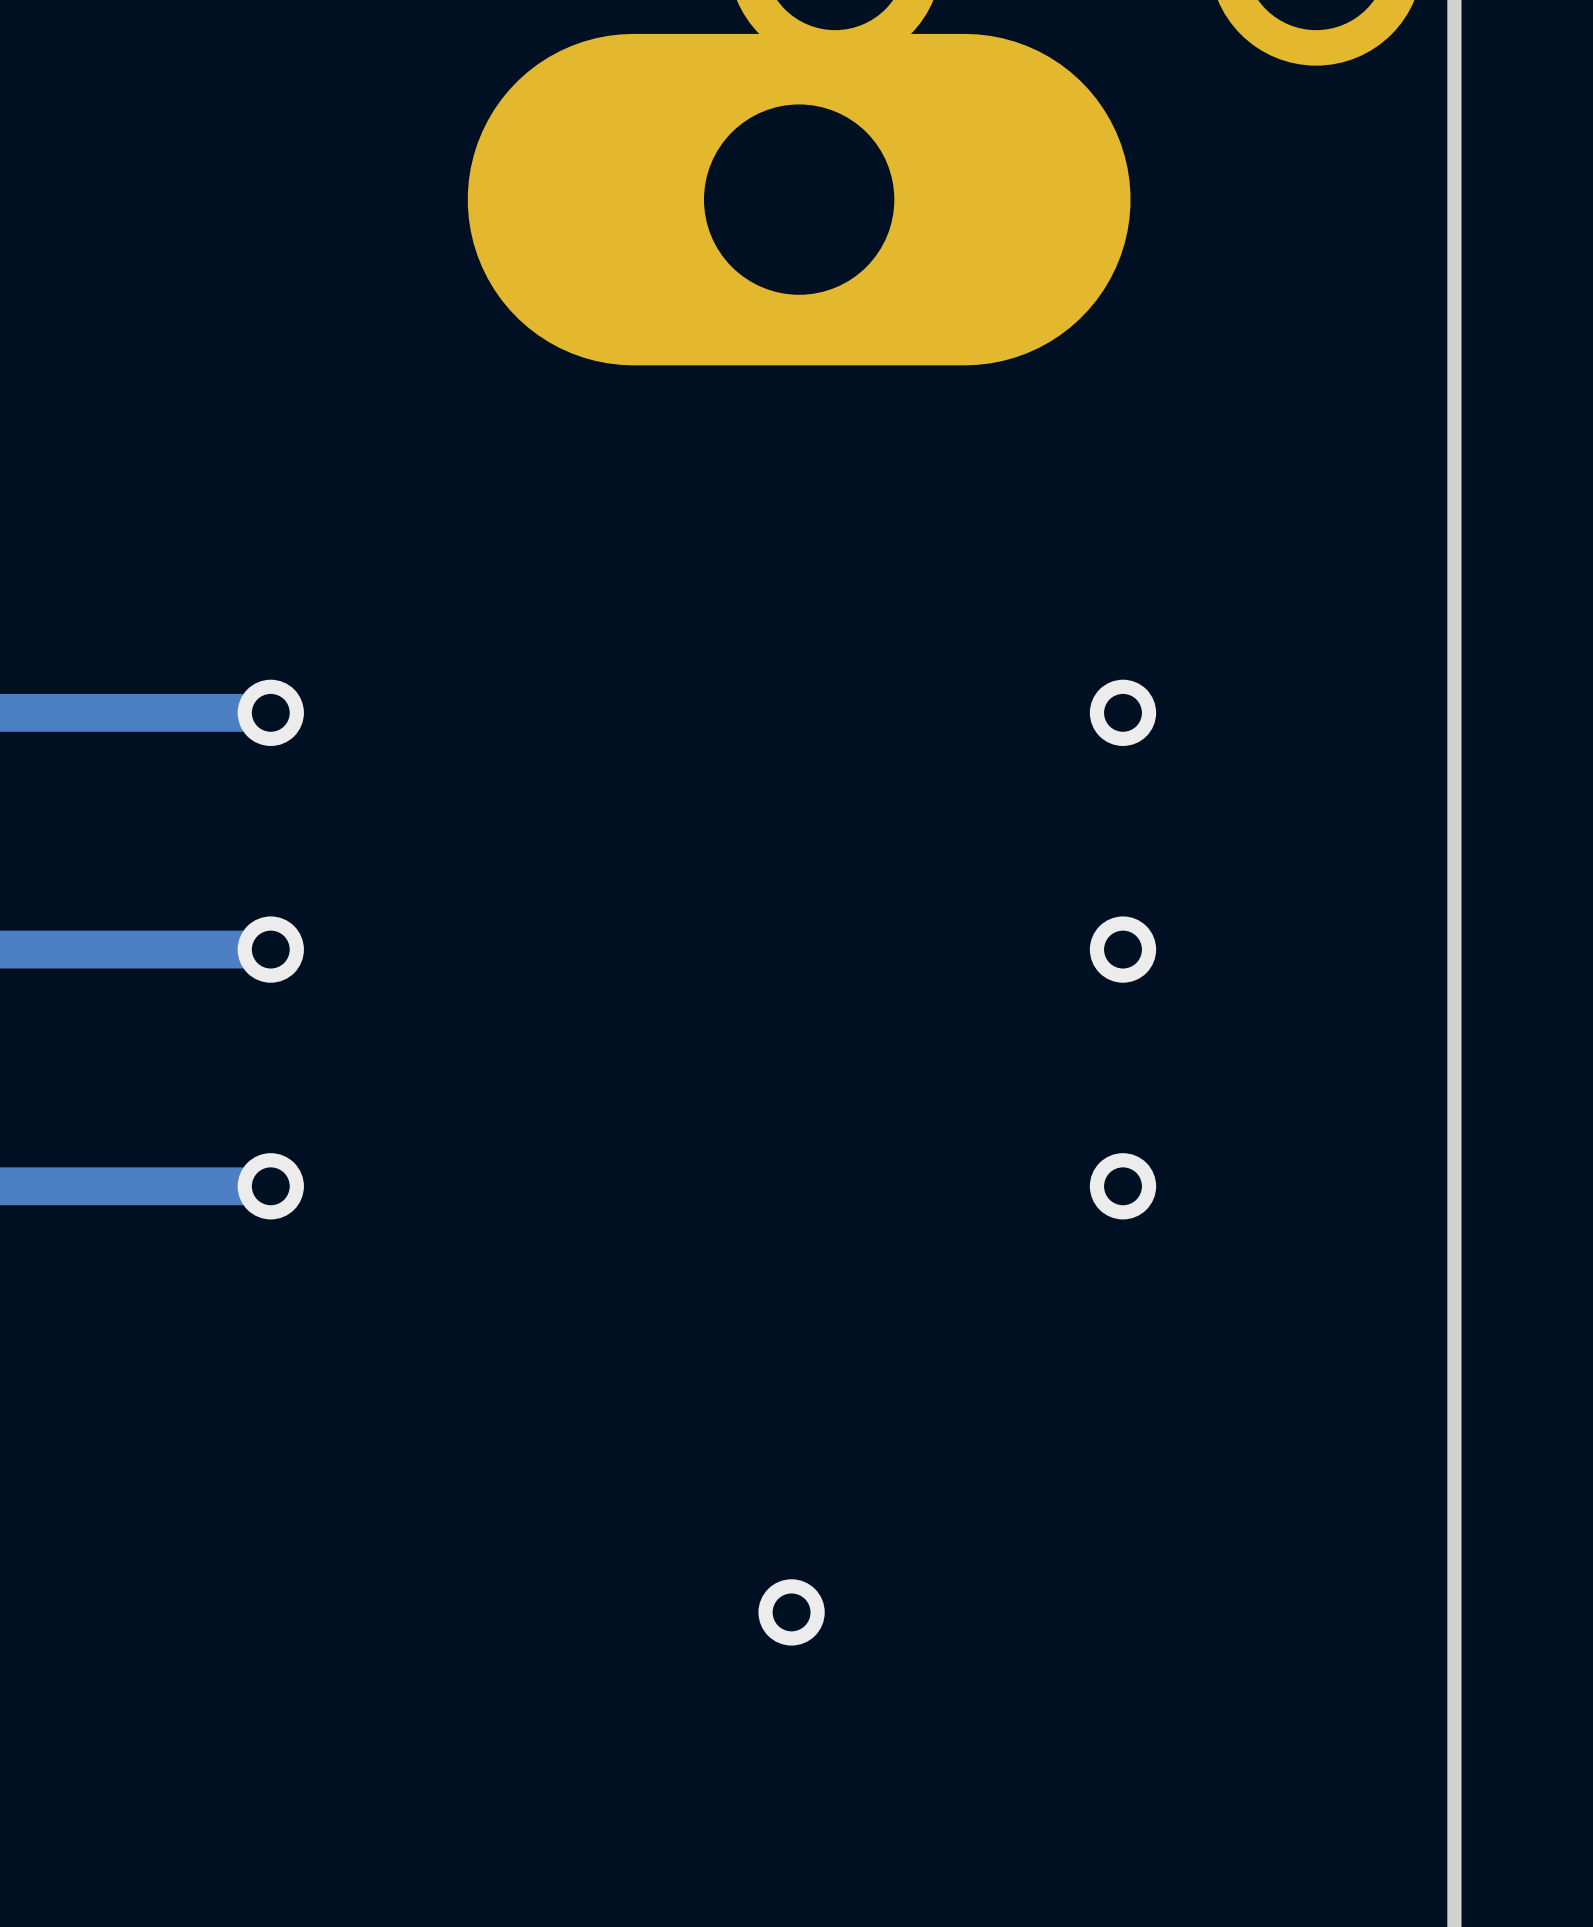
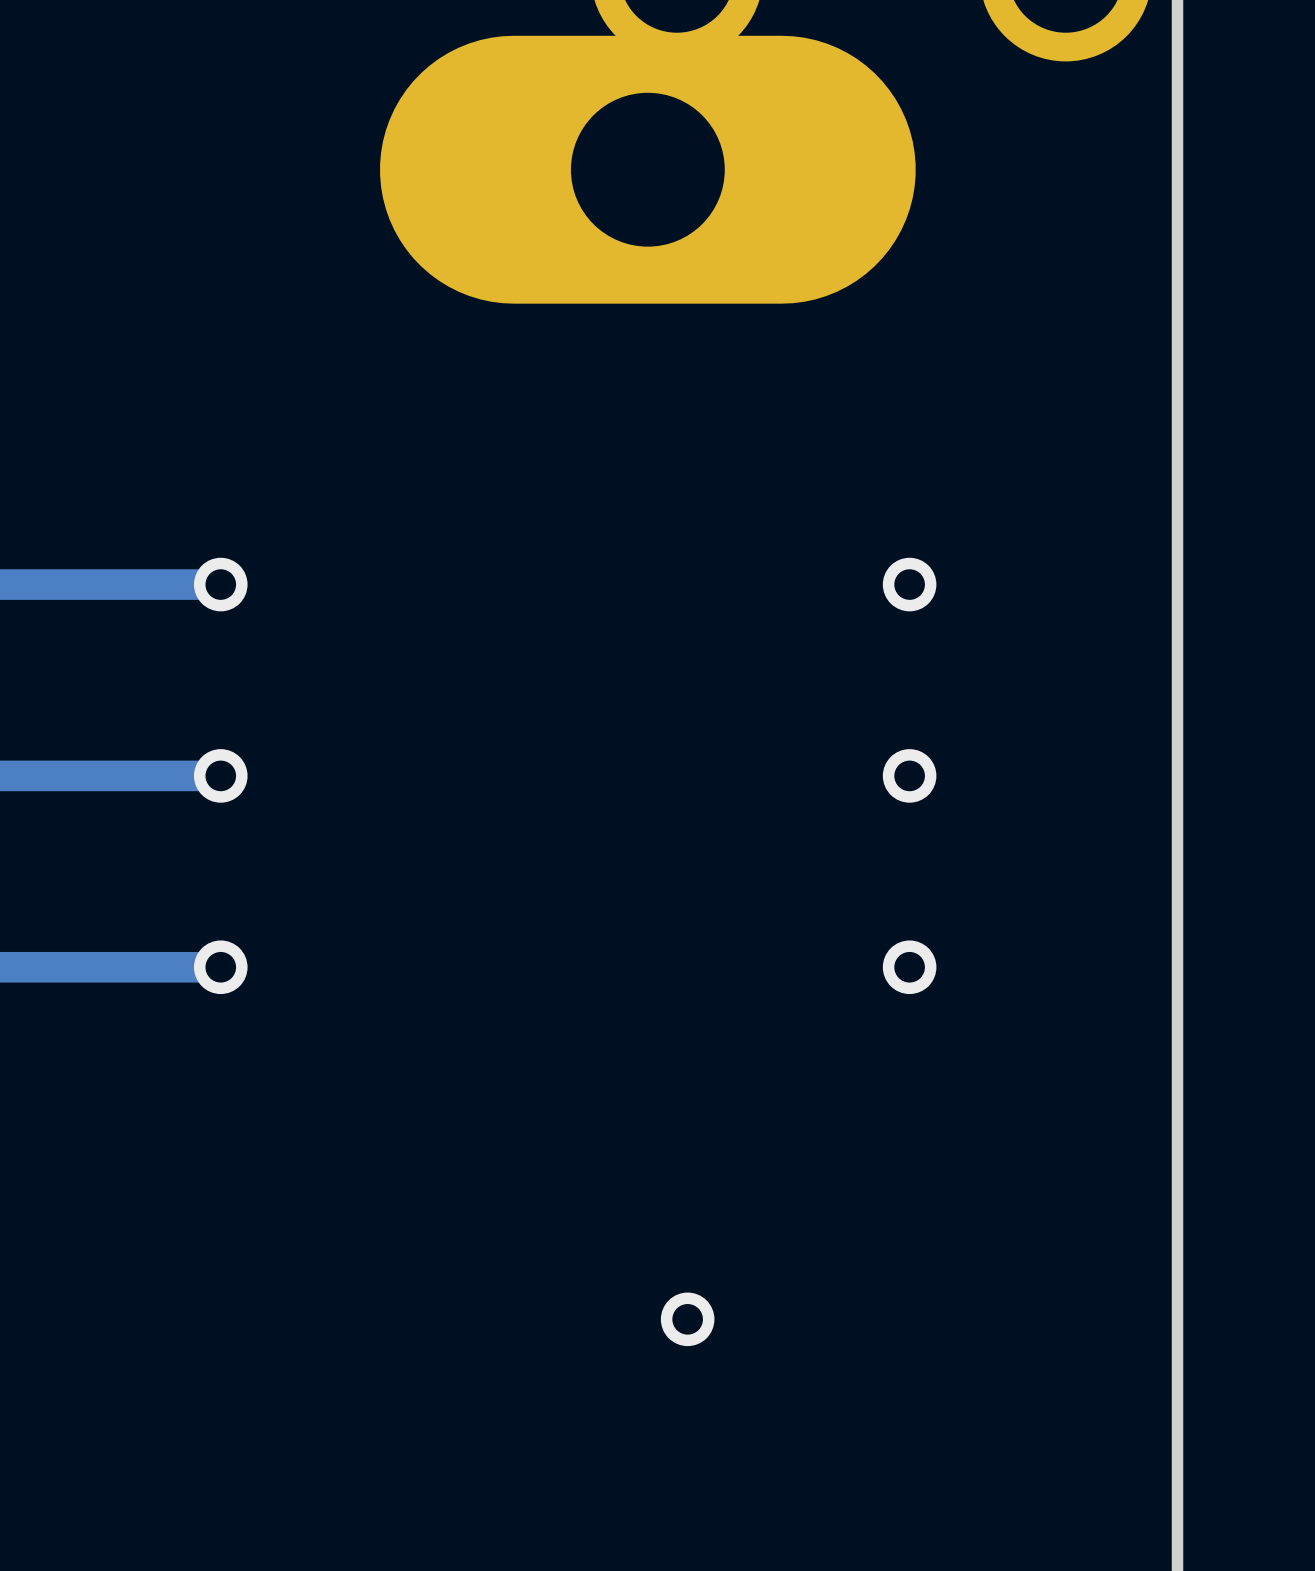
via position: (791, 1612) -> (687, 1319)

